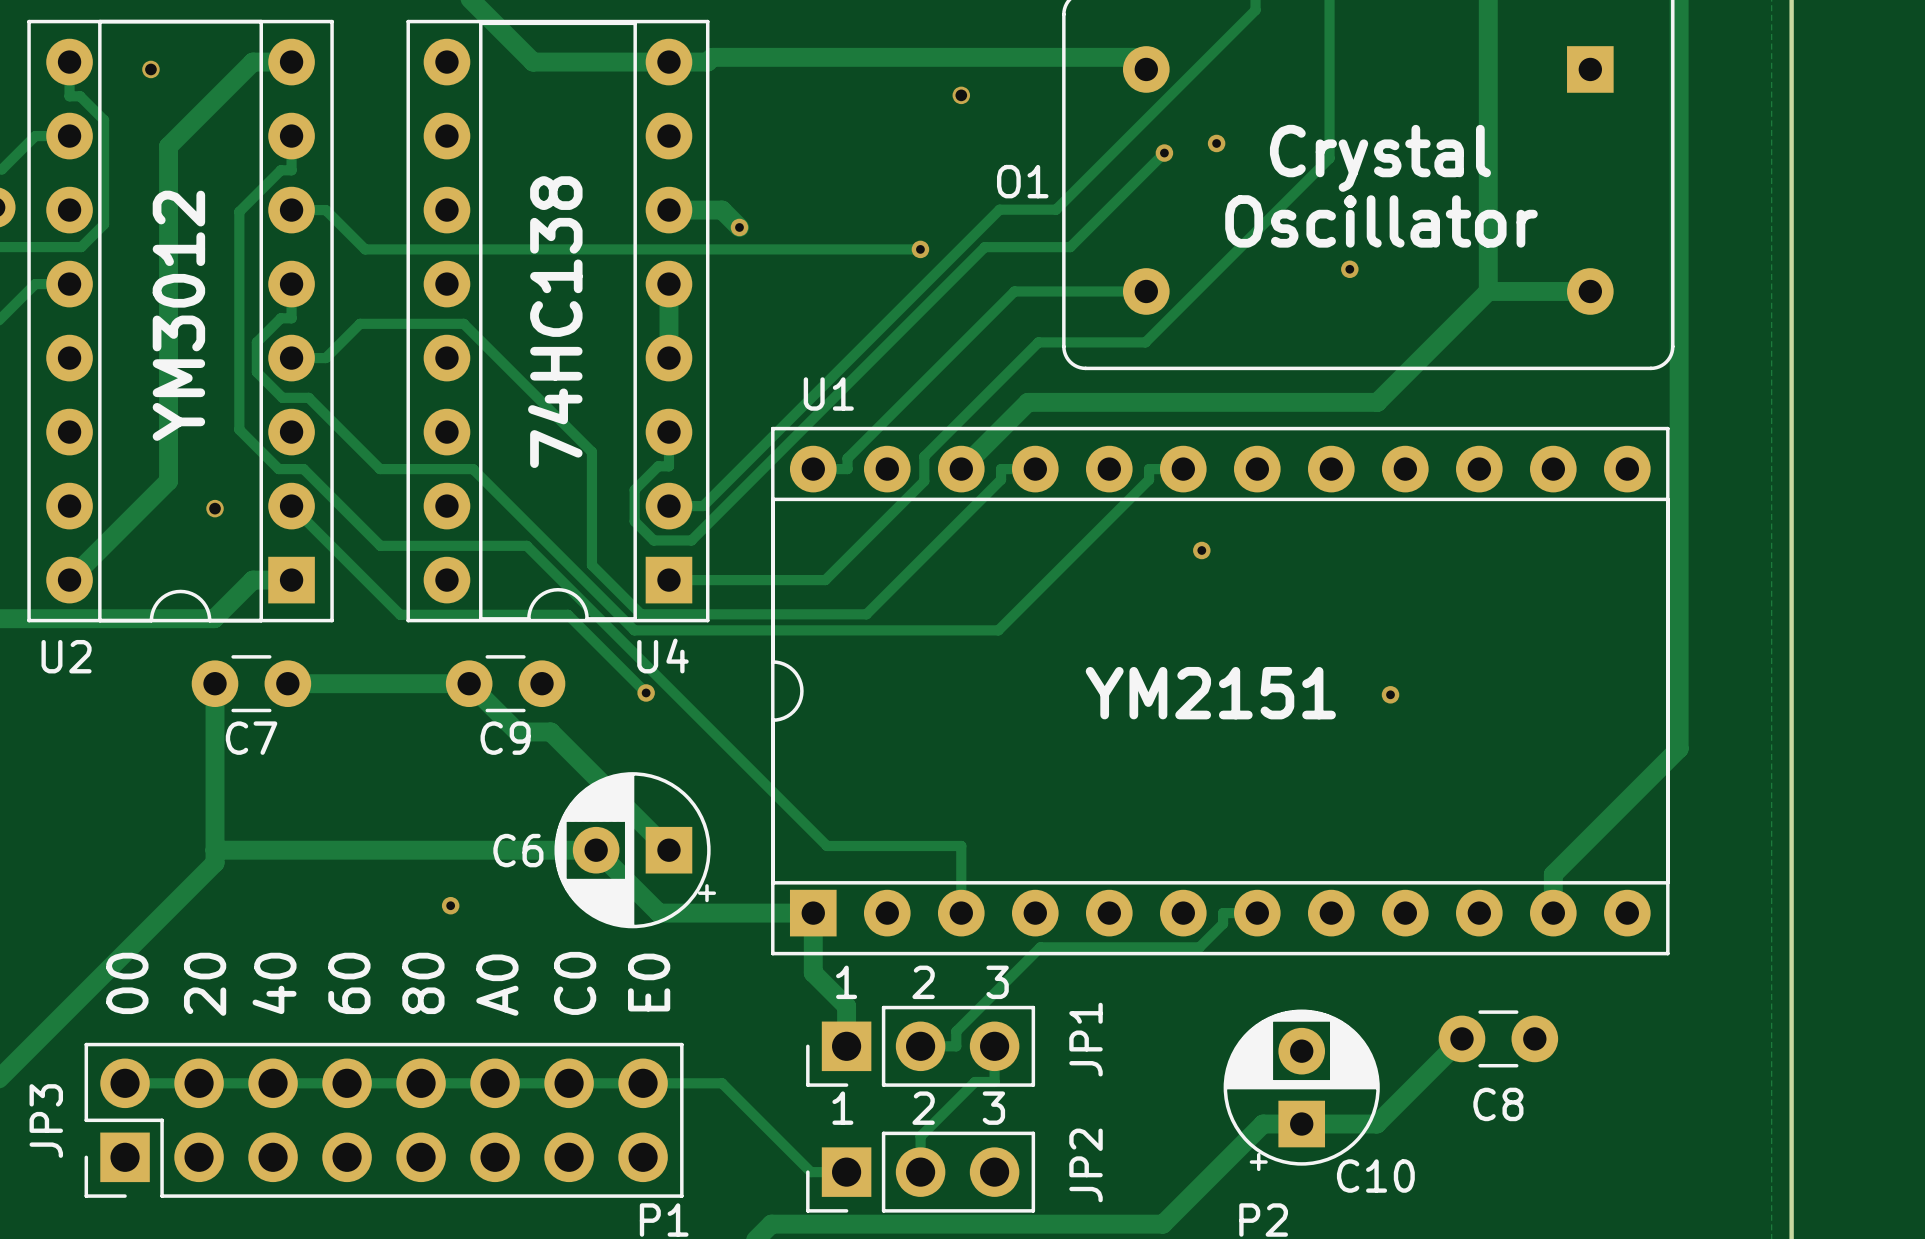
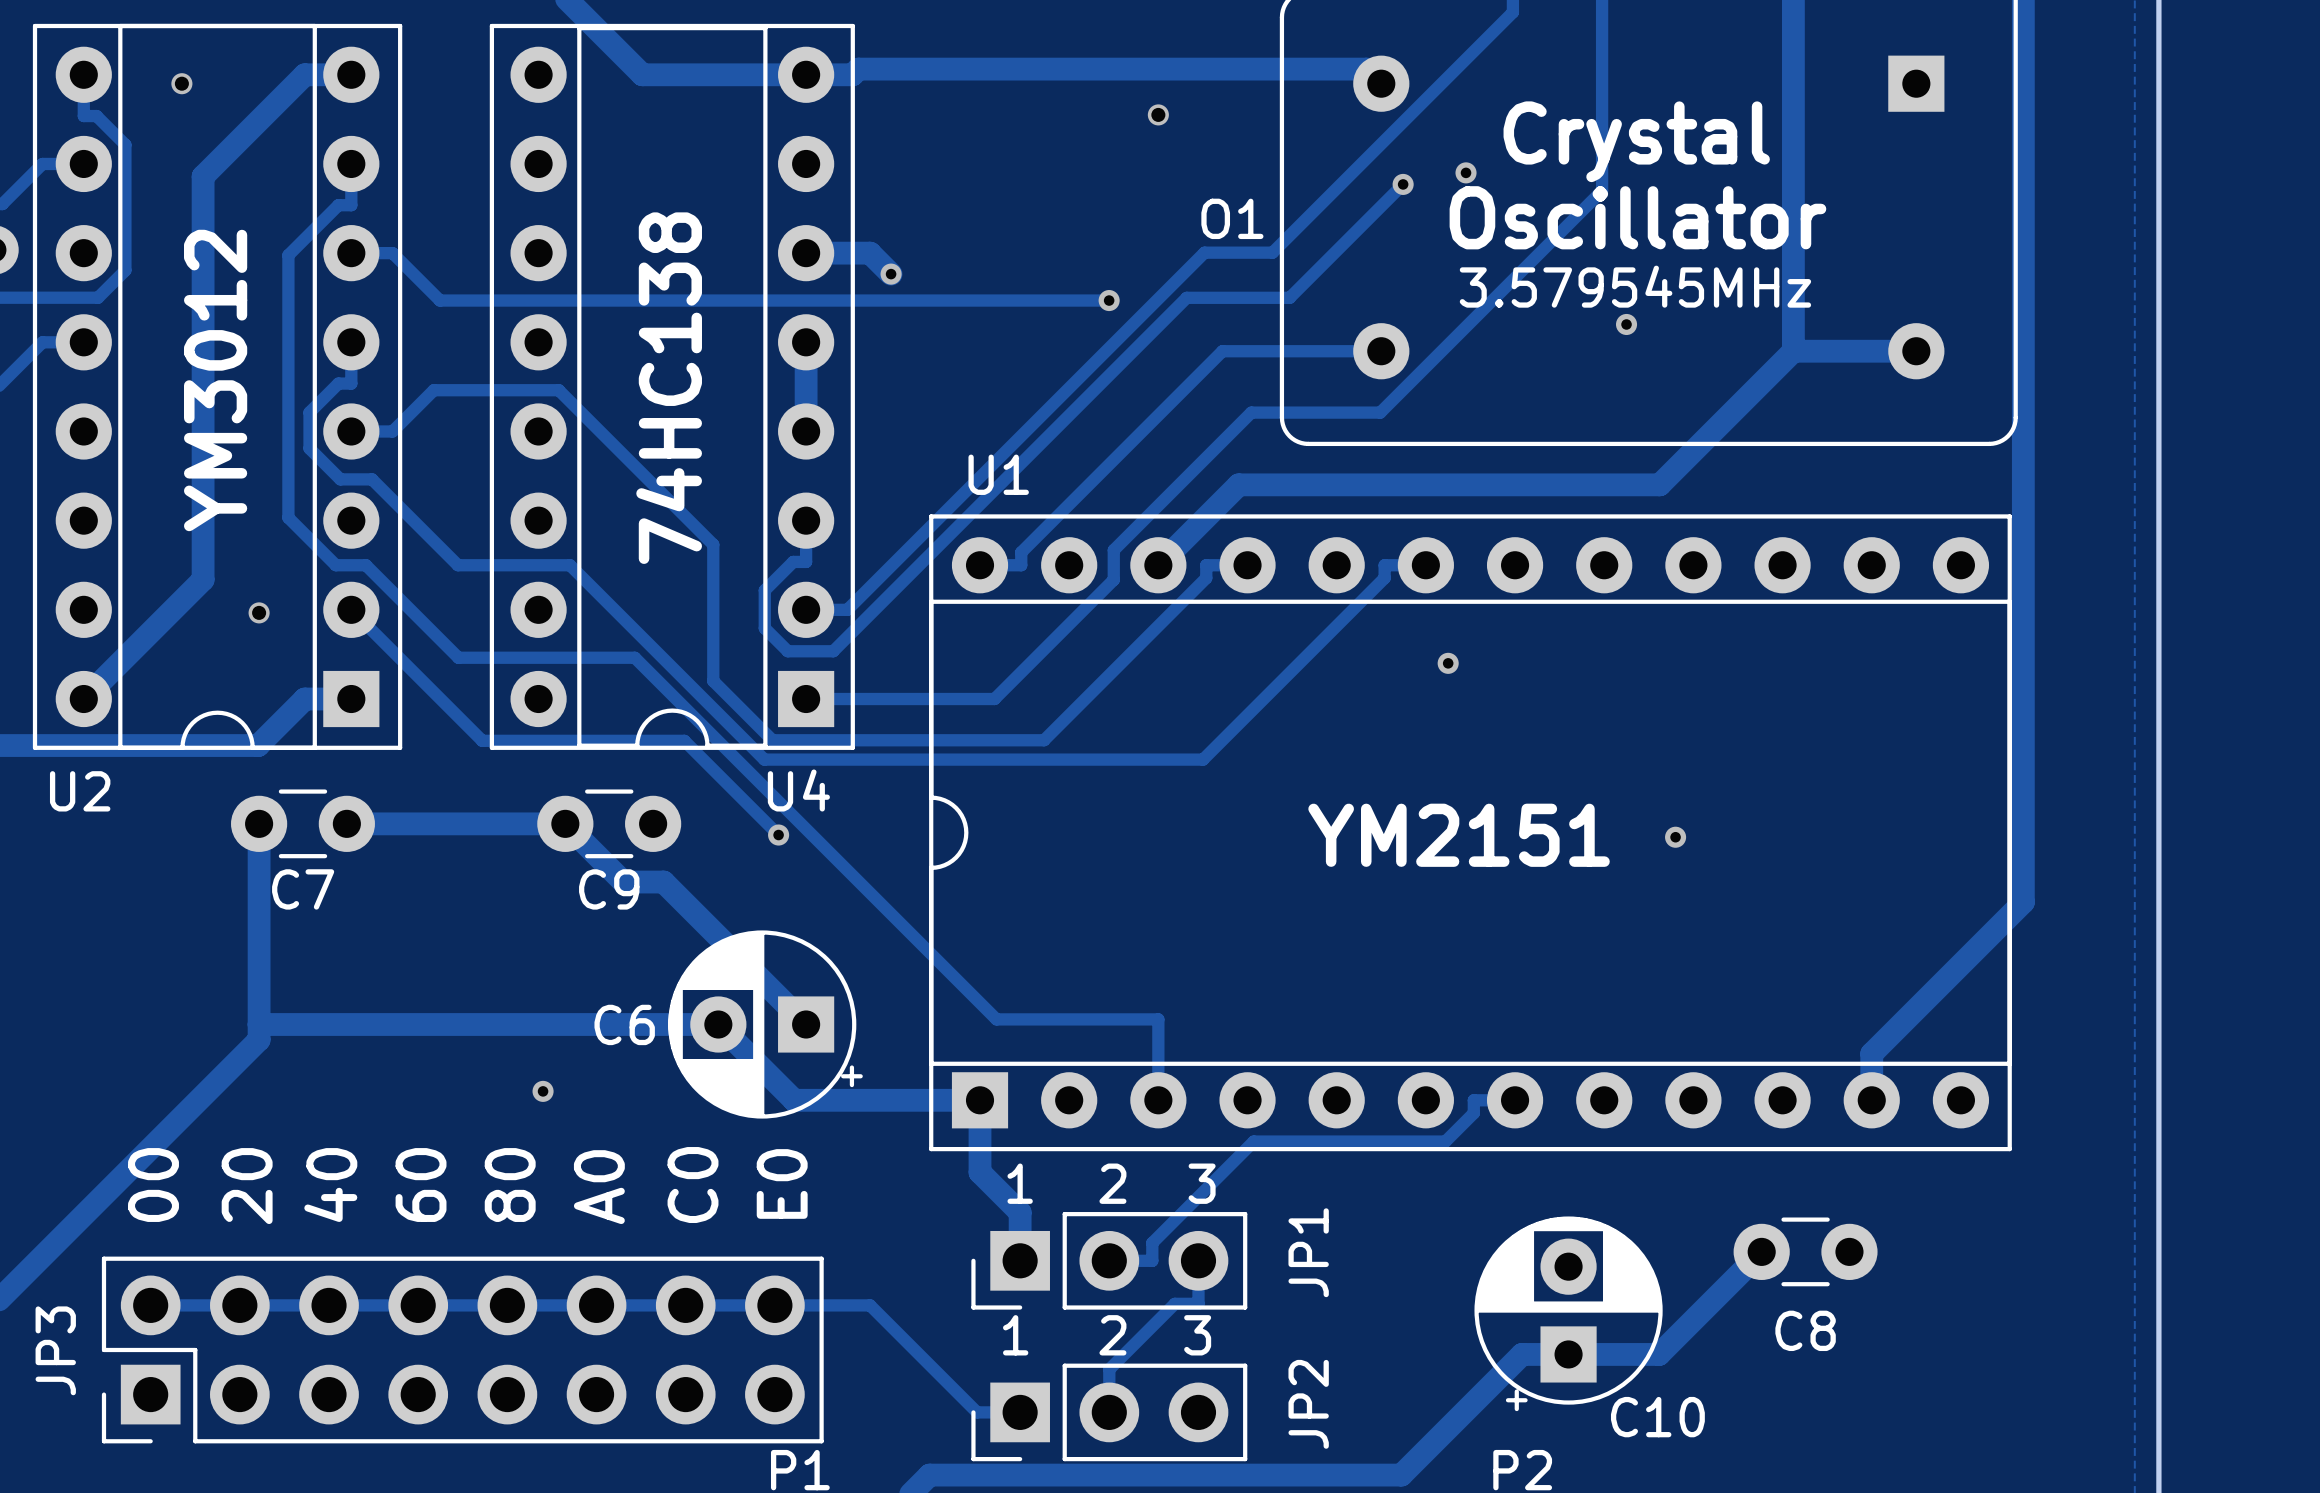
text position: Crystal (1380, 158) -> Crystal (1636, 141)
text position: Oscillator (1381, 221) -> Oscillator (1637, 217)
text: none -> 3.579545MHz (1635, 286)

